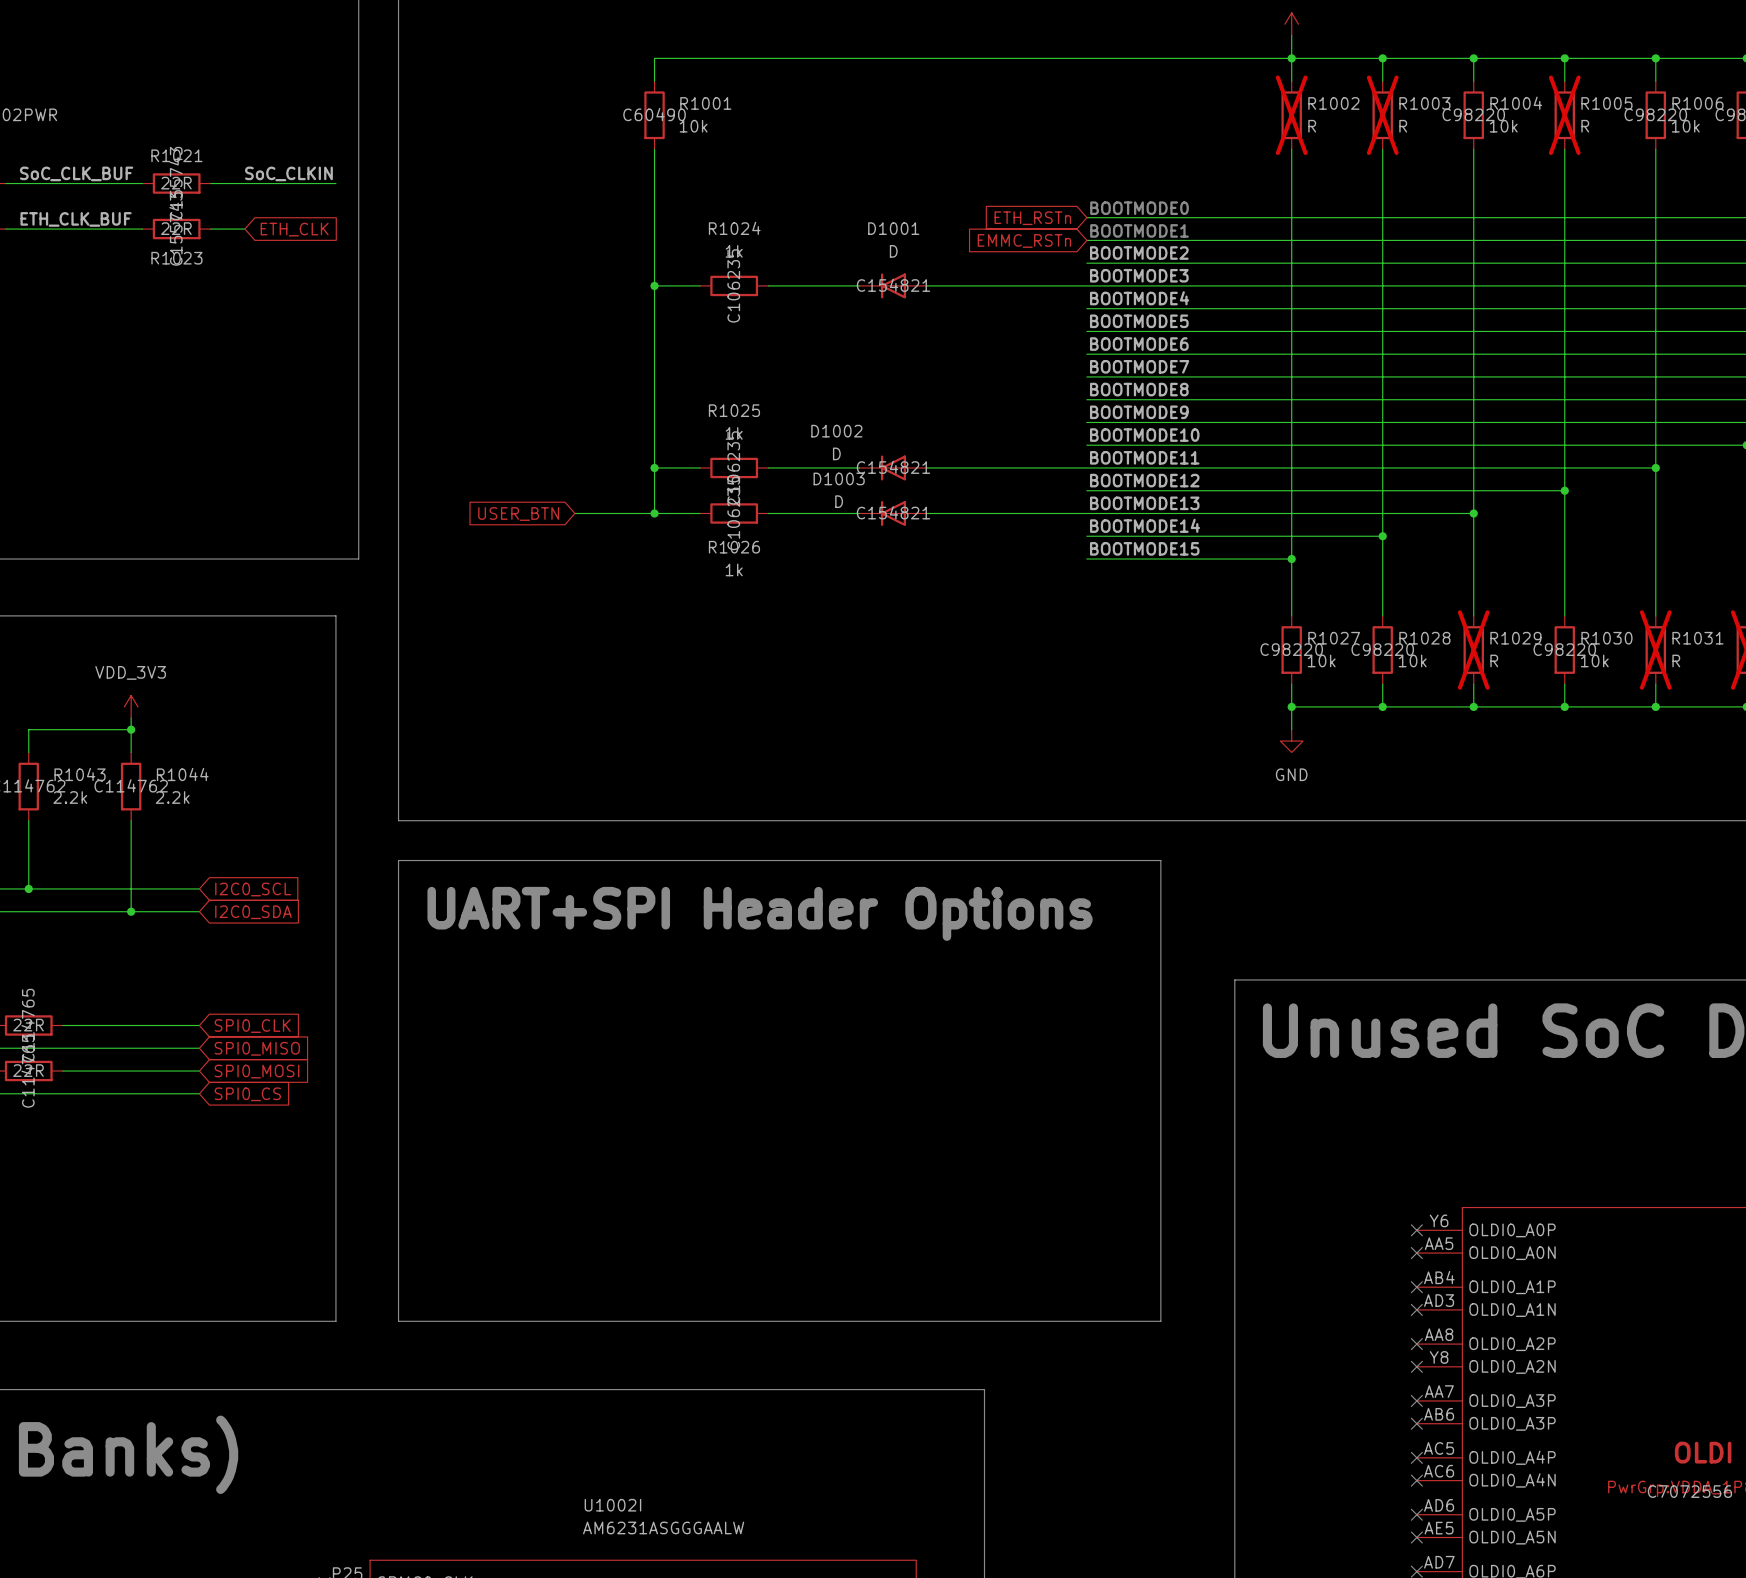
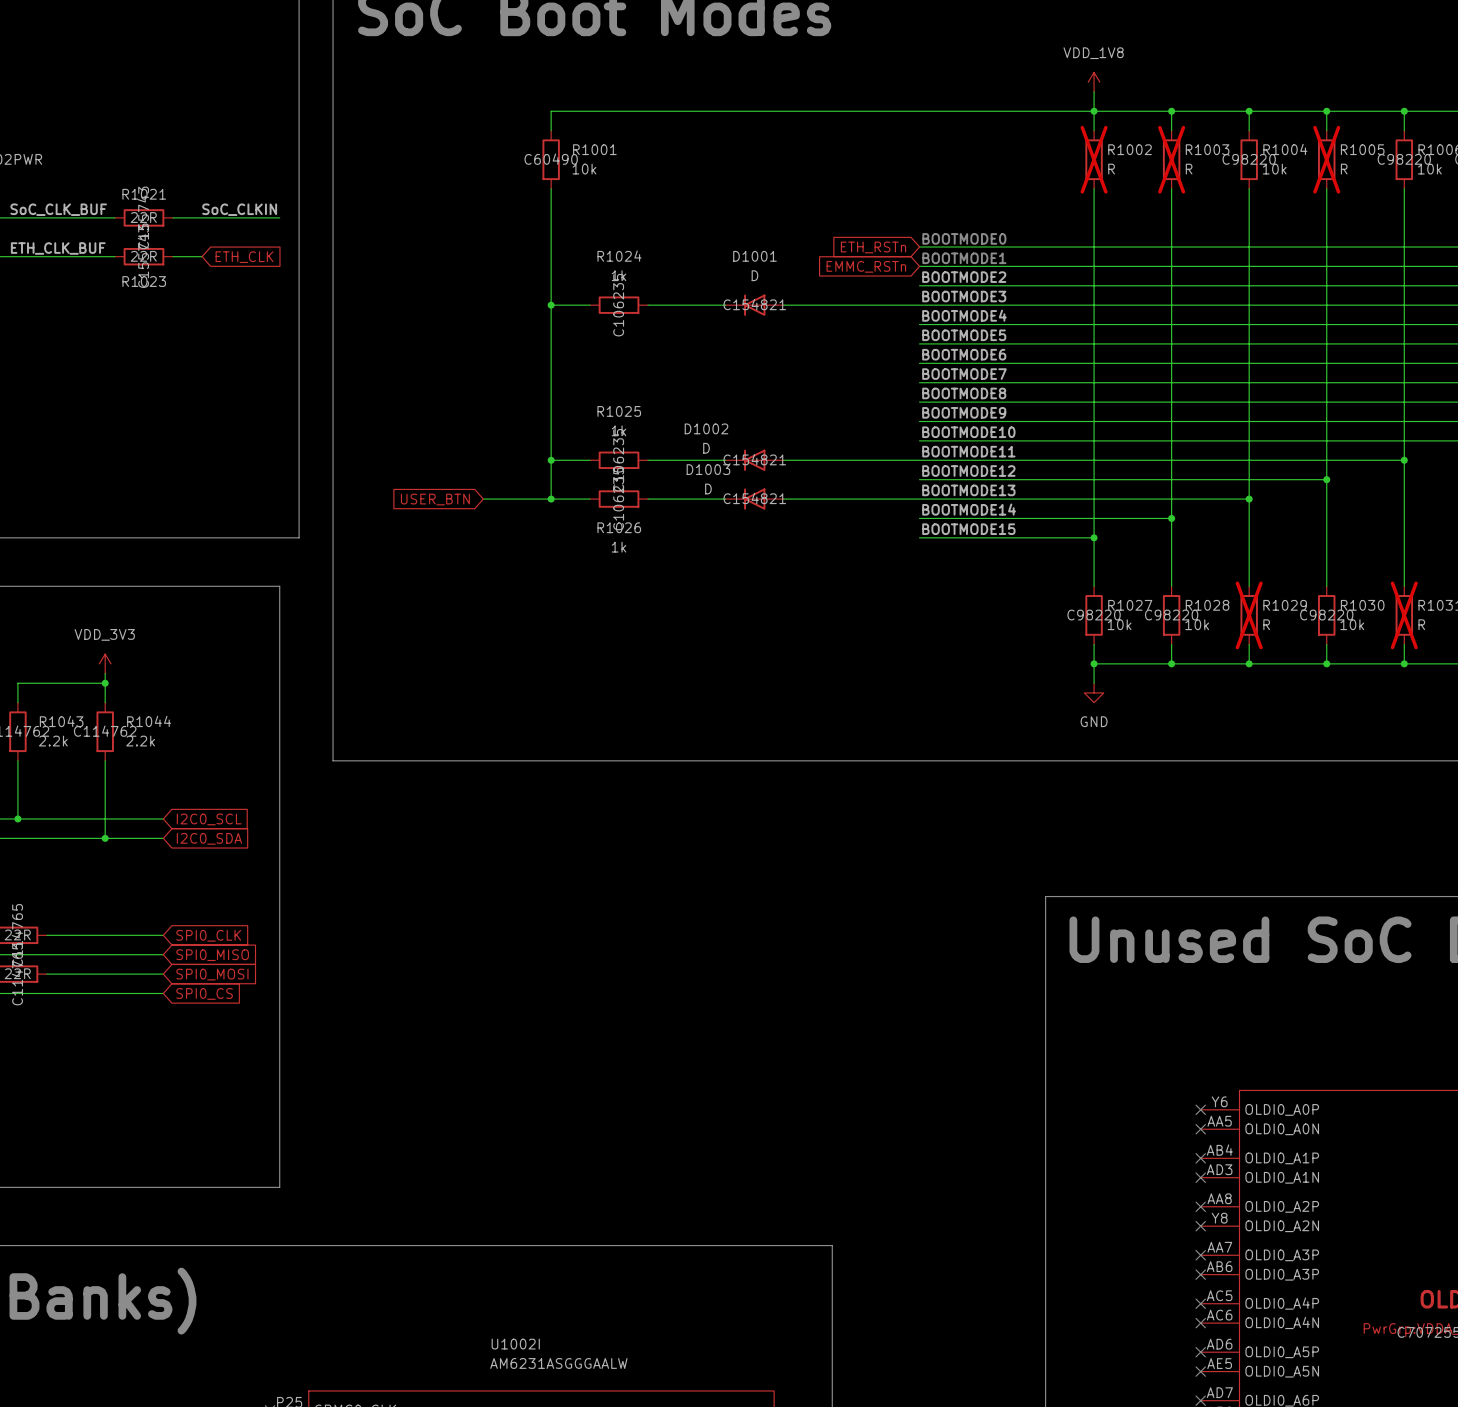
line: (398, 860) (1160, 860) (1160, 1321) (398, 1321) (398, 860) -> none
text: UART+SPI Header Options (760, 913) -> none

